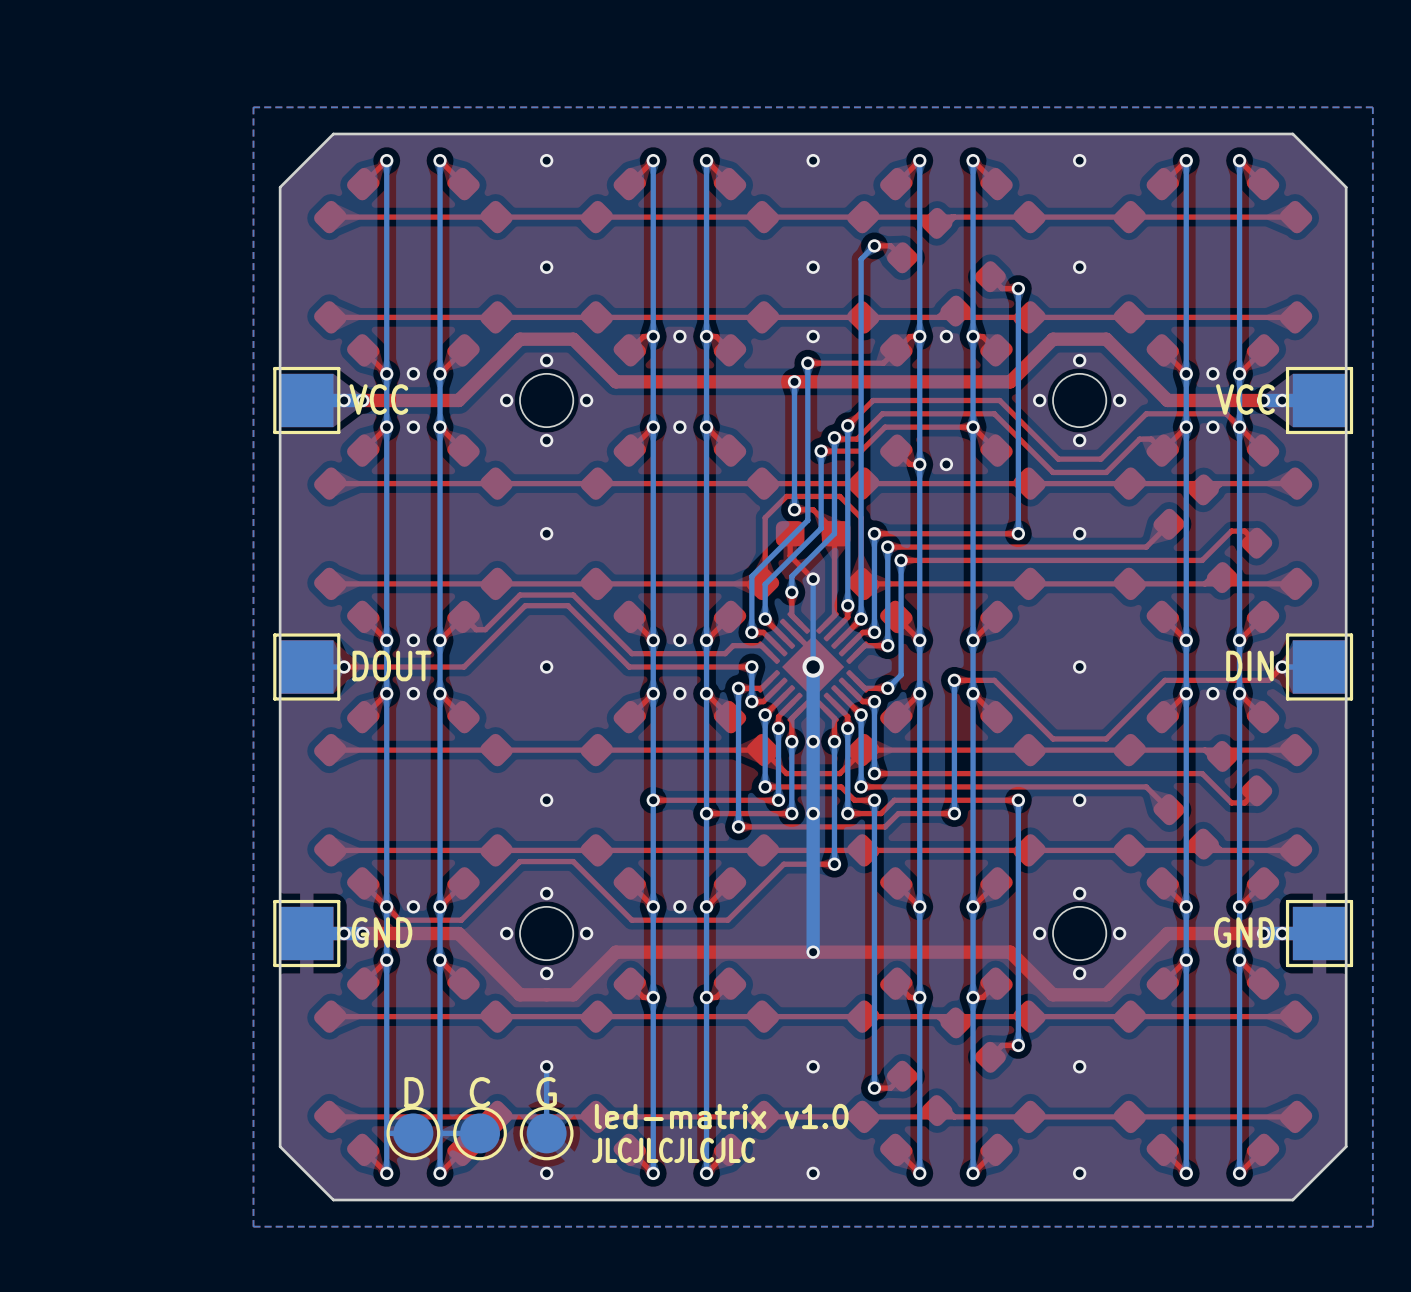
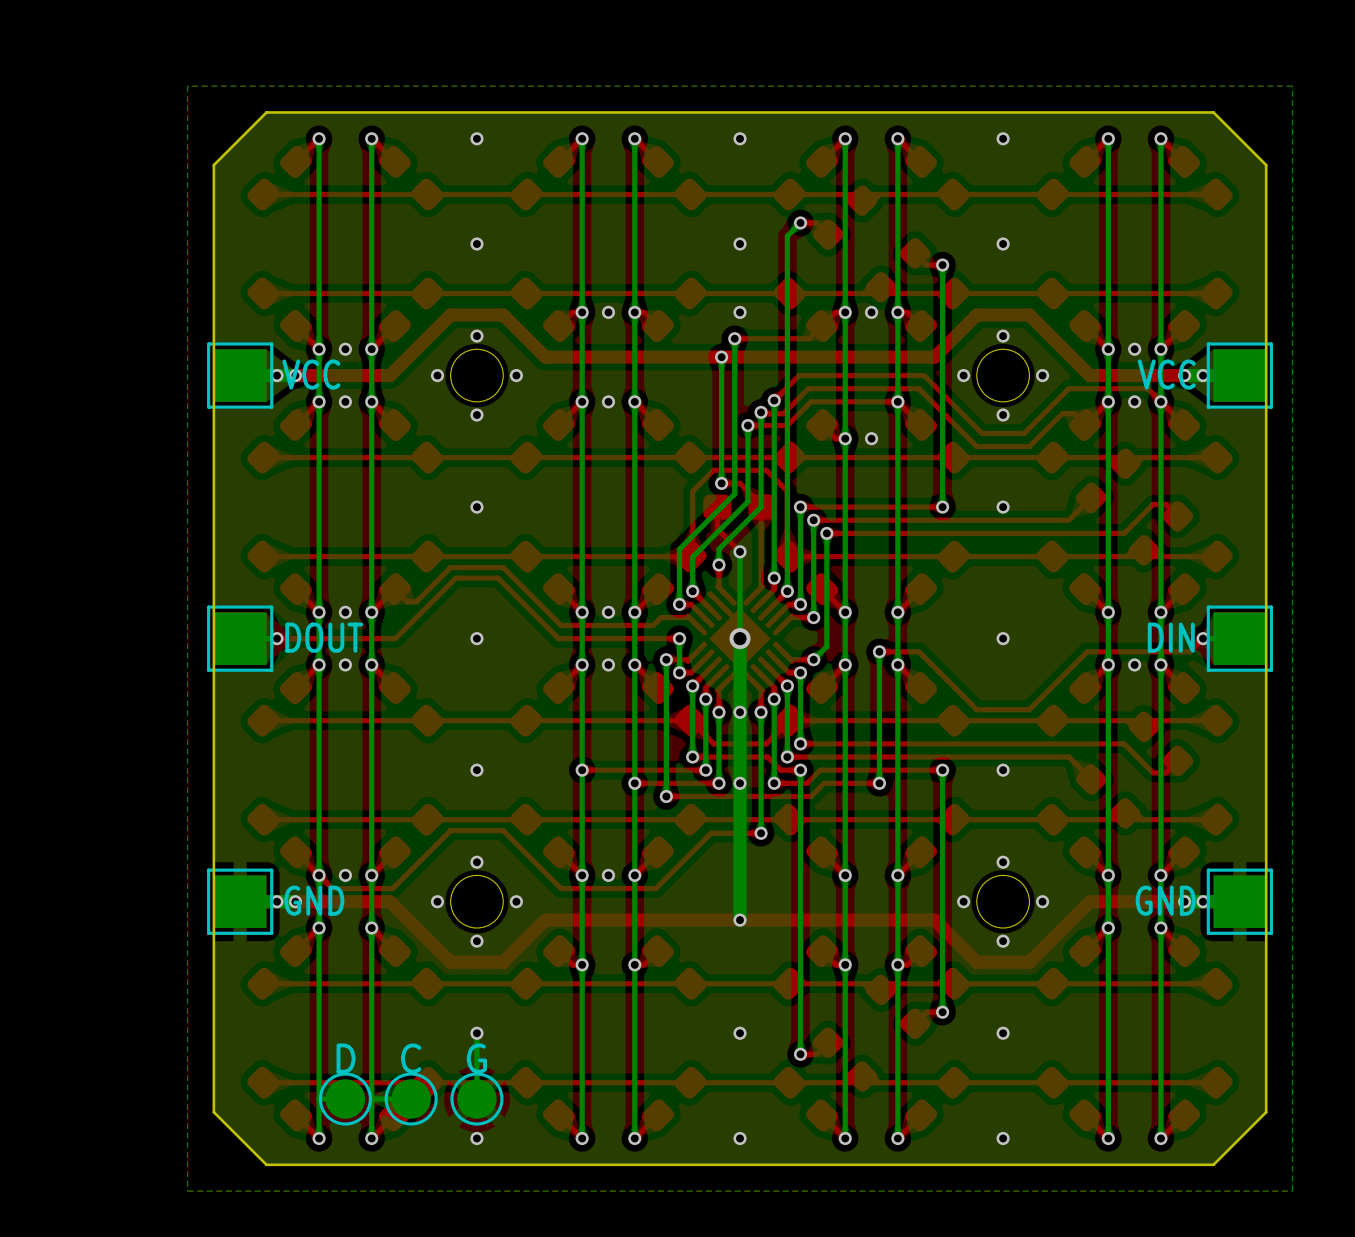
text: led-matrix v1.0 (721, 1116) -> none
text: JLCJLCJLCJLC (673, 1150) -> none

